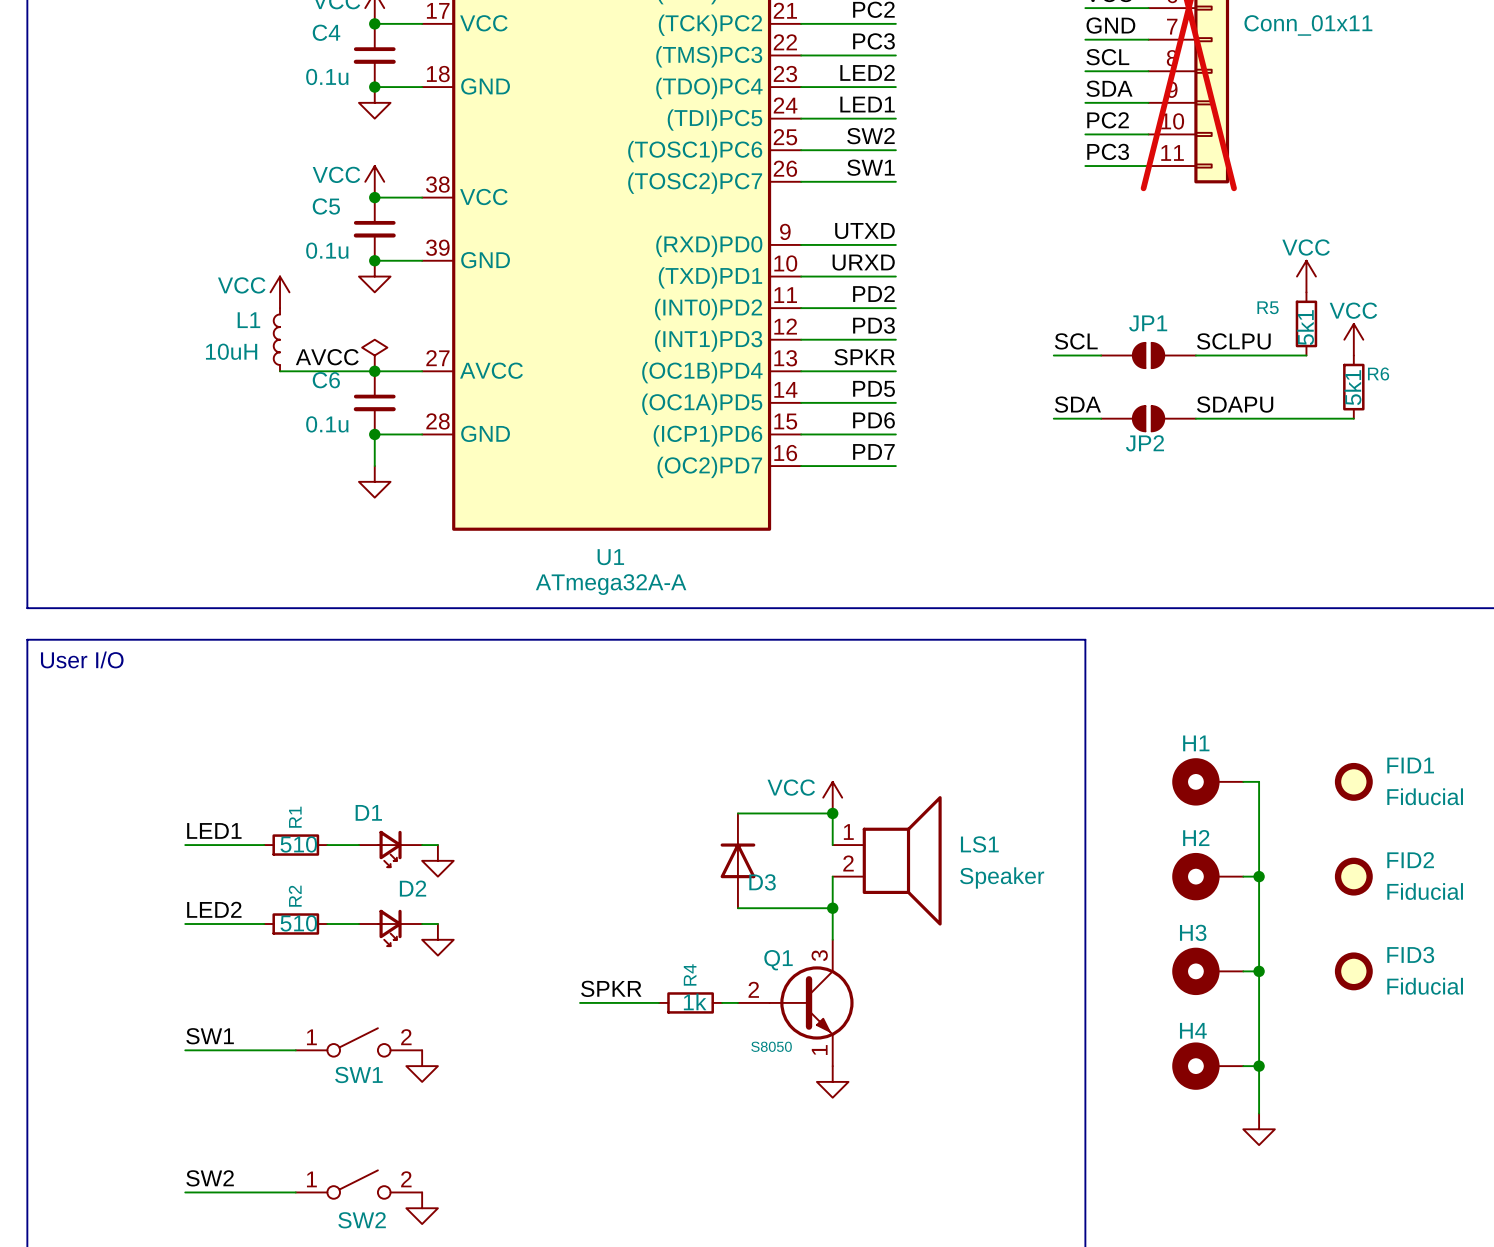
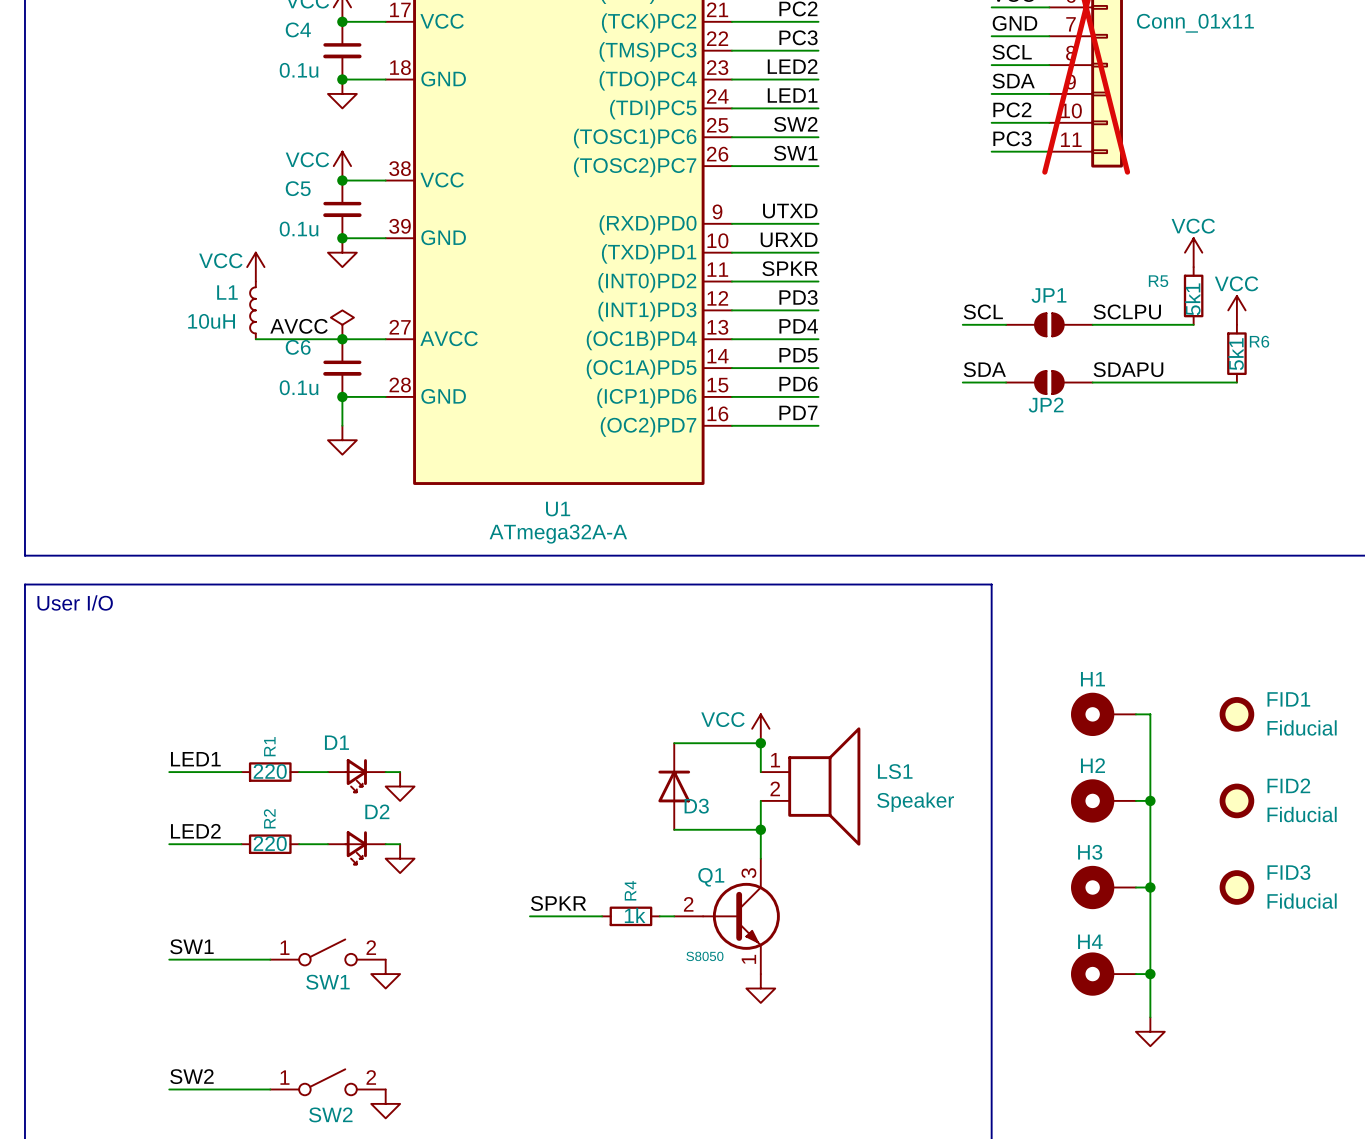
label: PD2 (873, 293) -> SPKR (789, 268)
label: SPKR (864, 357) -> PD4 (798, 326)
R1 value: 510 (298, 844) -> 220 (270, 771)
R2 value: 510 (298, 923) -> 220 (270, 843)

